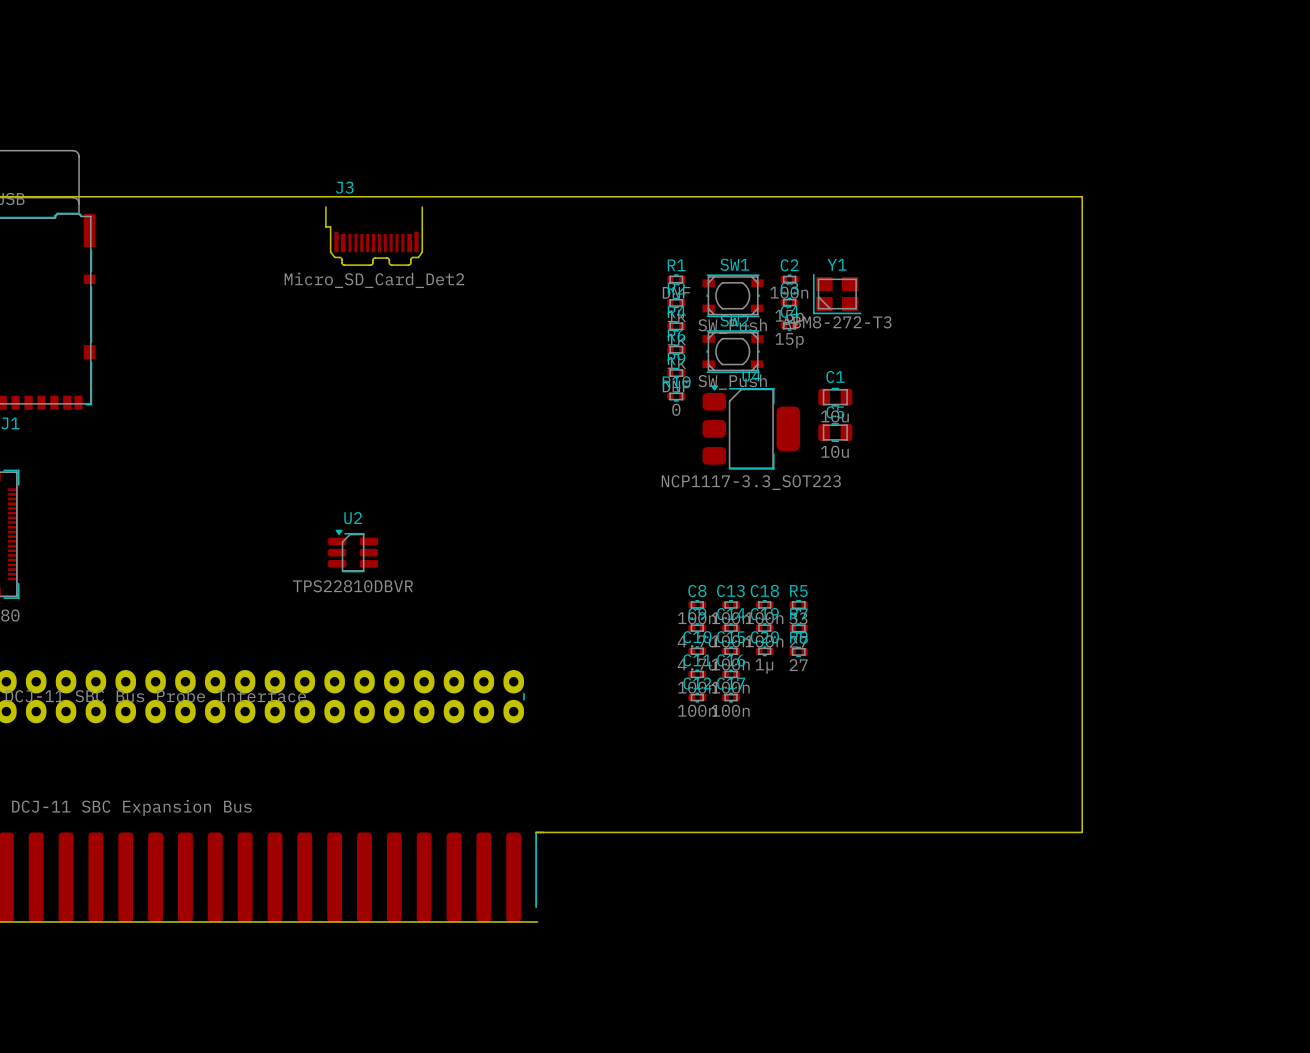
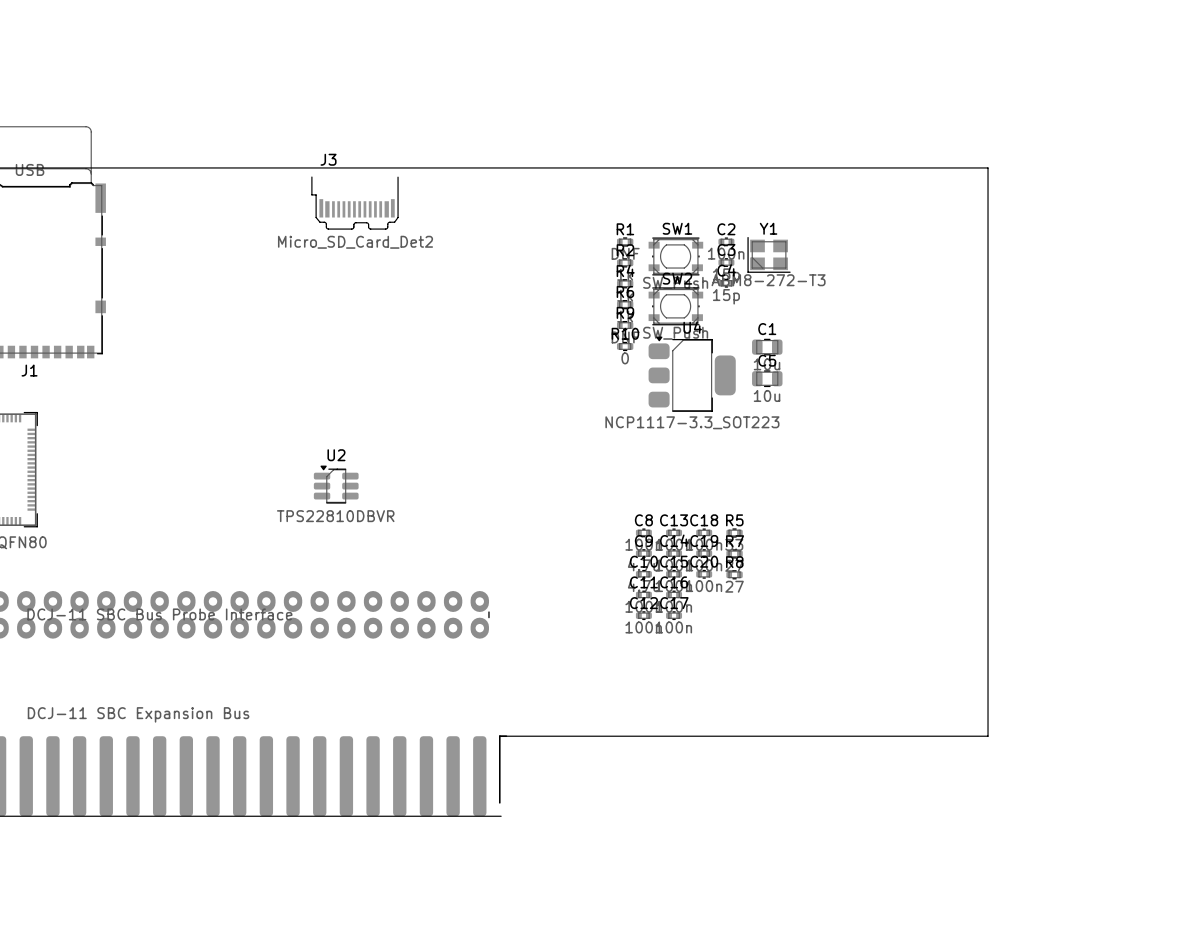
C20 value: 1µ (764, 666) -> 100n (703, 586)

